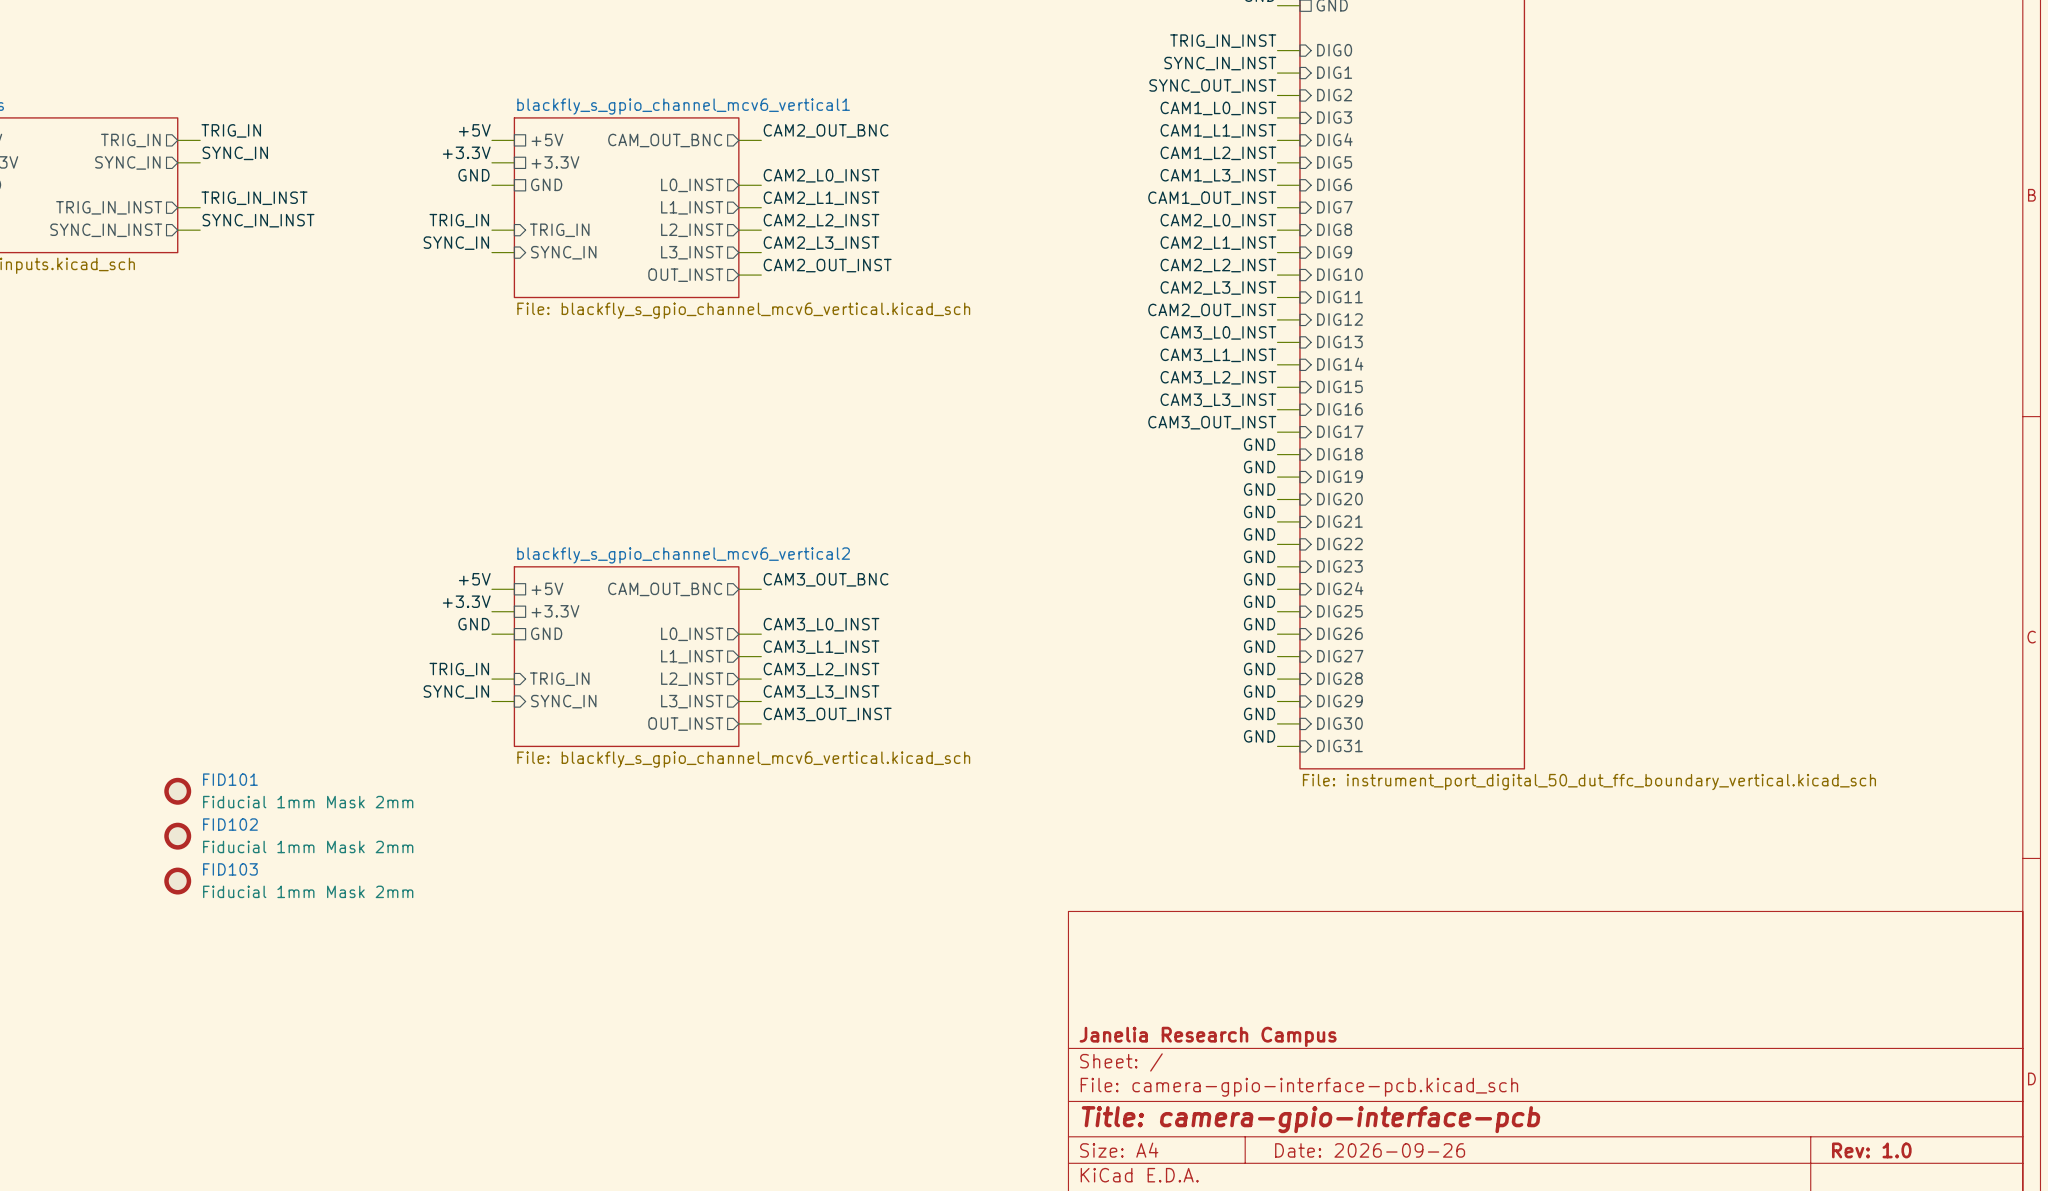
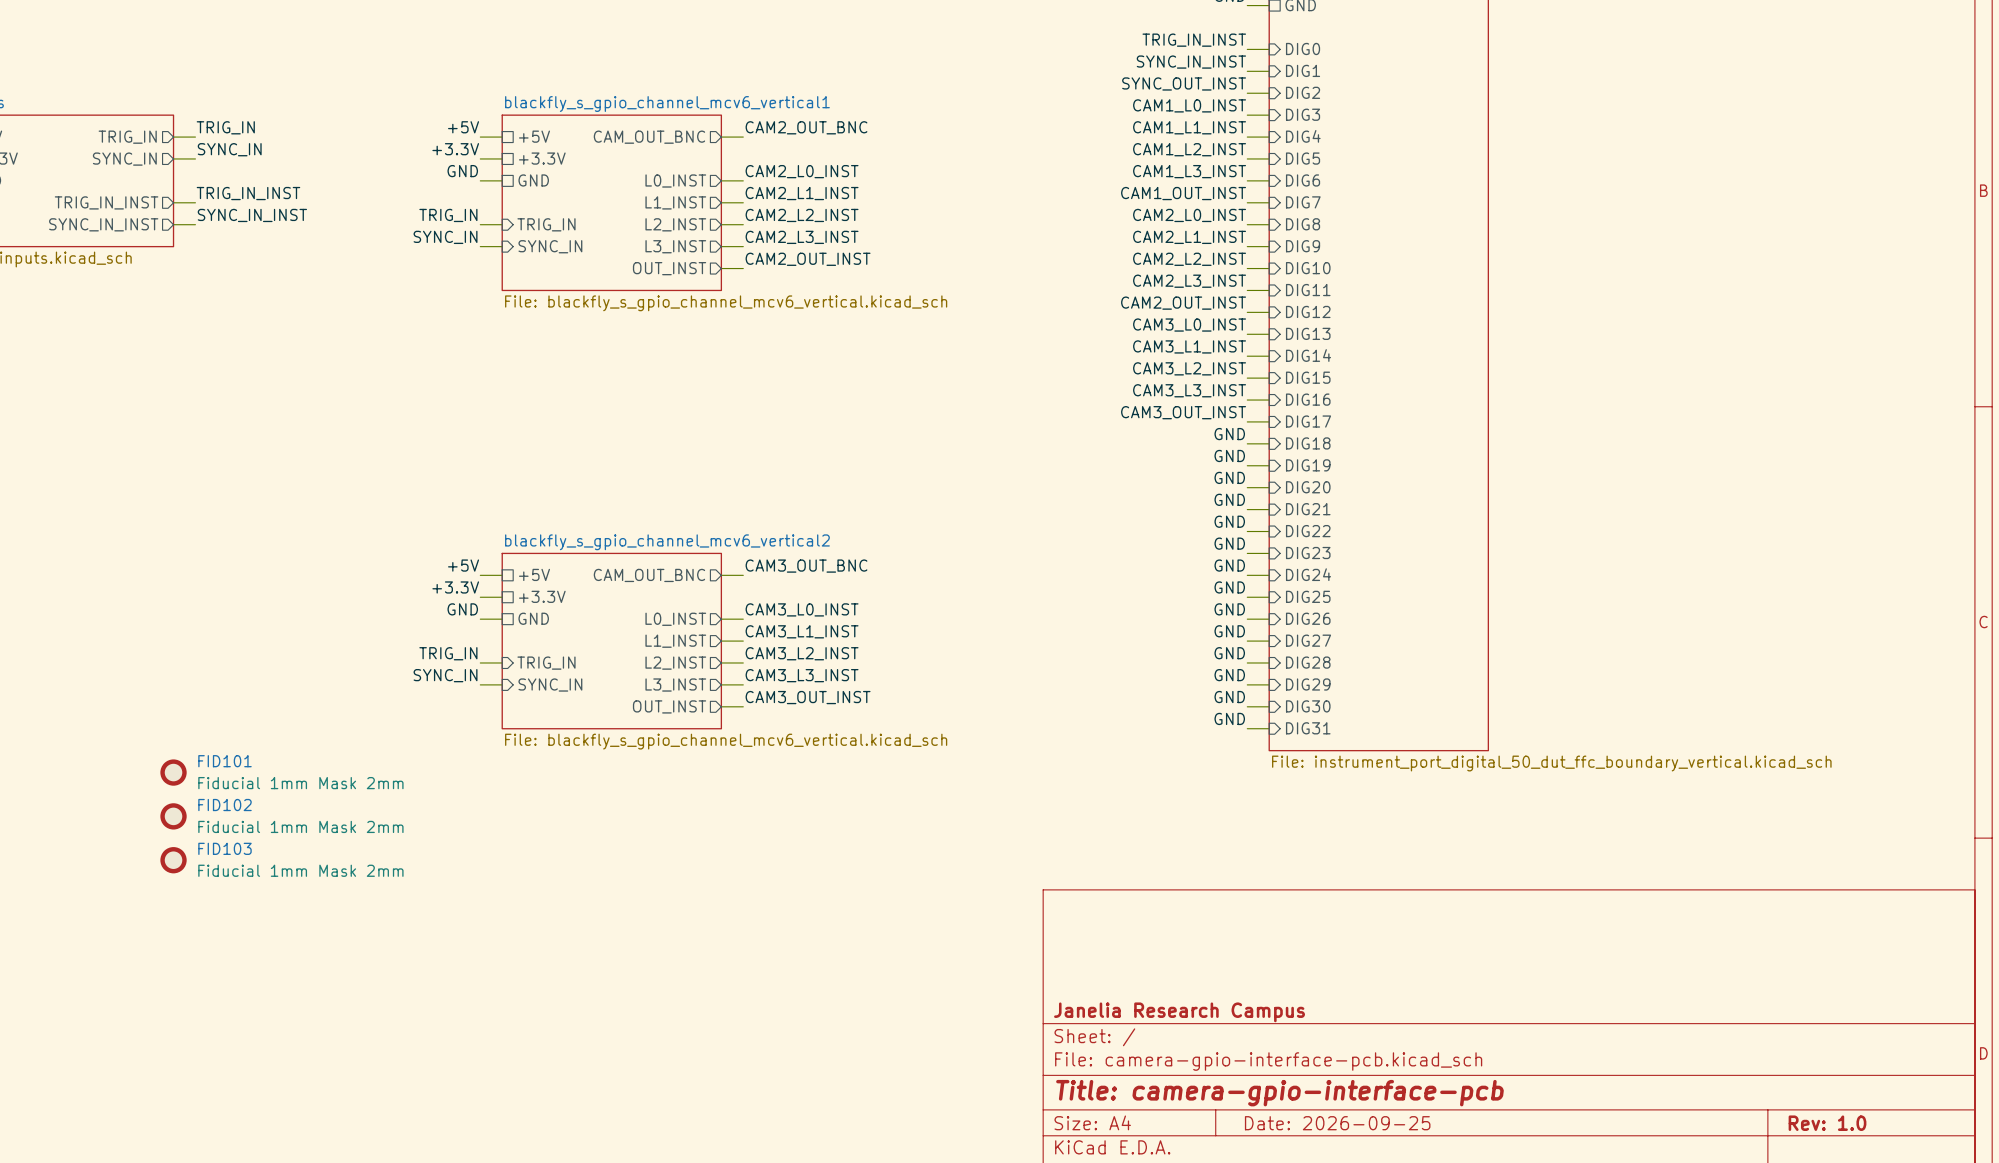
title block: Date: 2026-09-26 (1370, 1150) -> Date: 2026-09-25 (1337, 1123)

